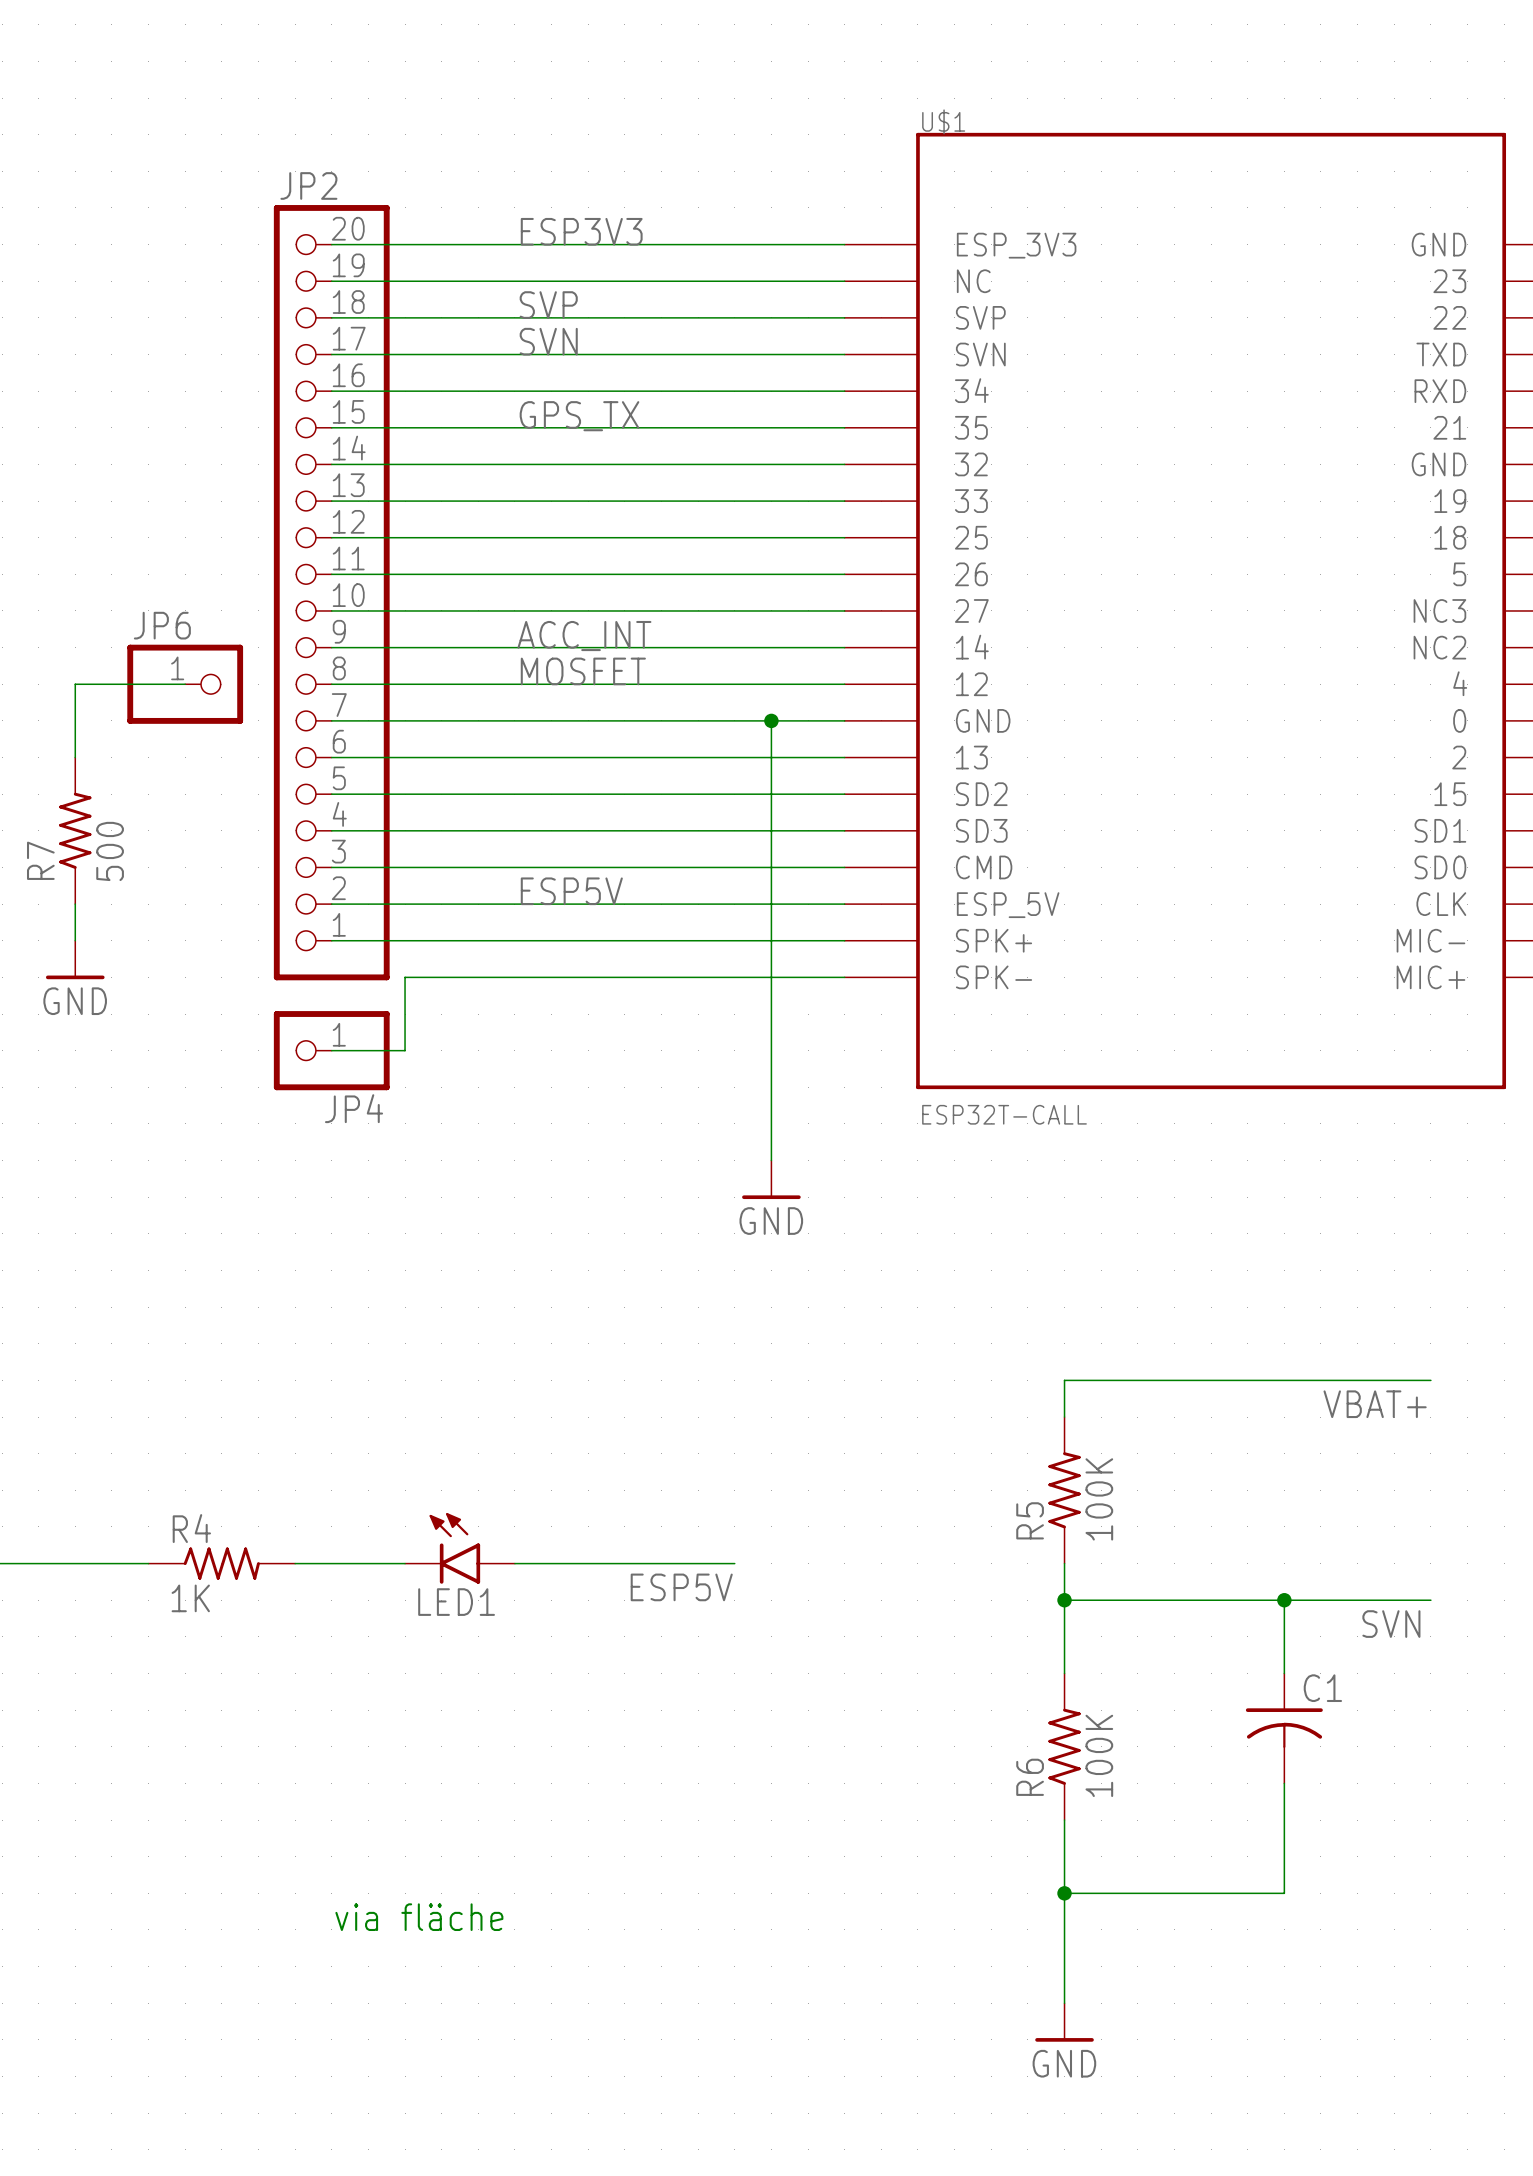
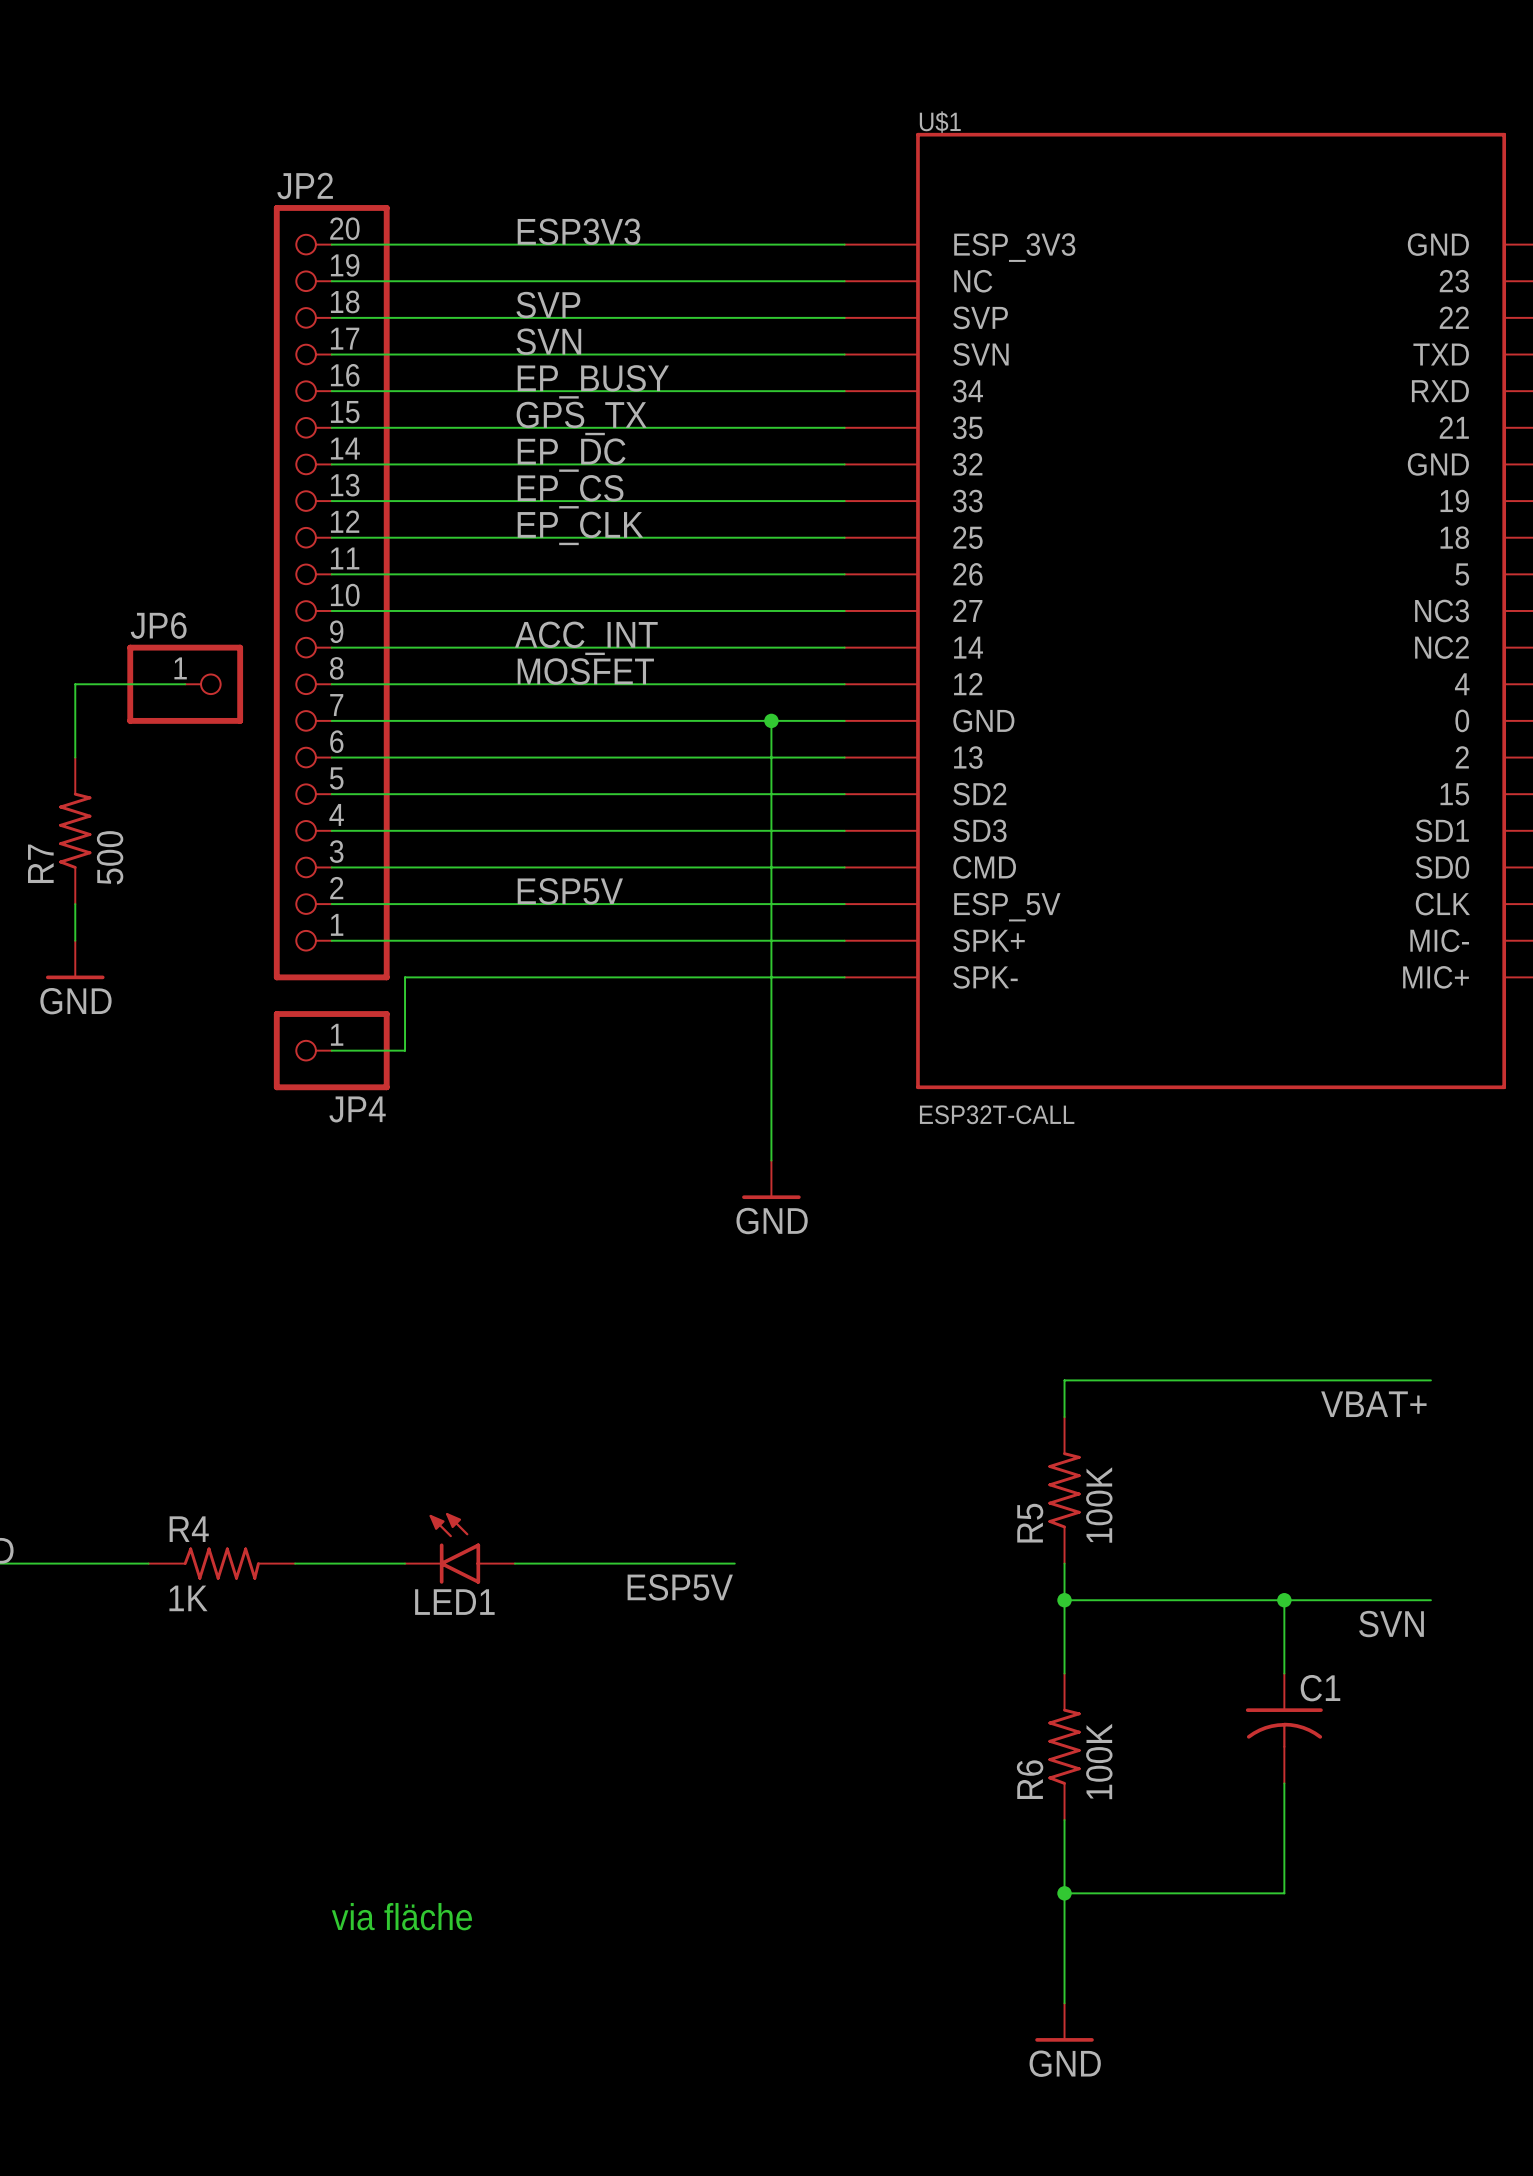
label: none -> EP_BUSY (593, 381)
label: none -> EP_DC (571, 455)
label: none -> EP_CS (570, 491)
label: none -> EP_CLK (580, 528)

